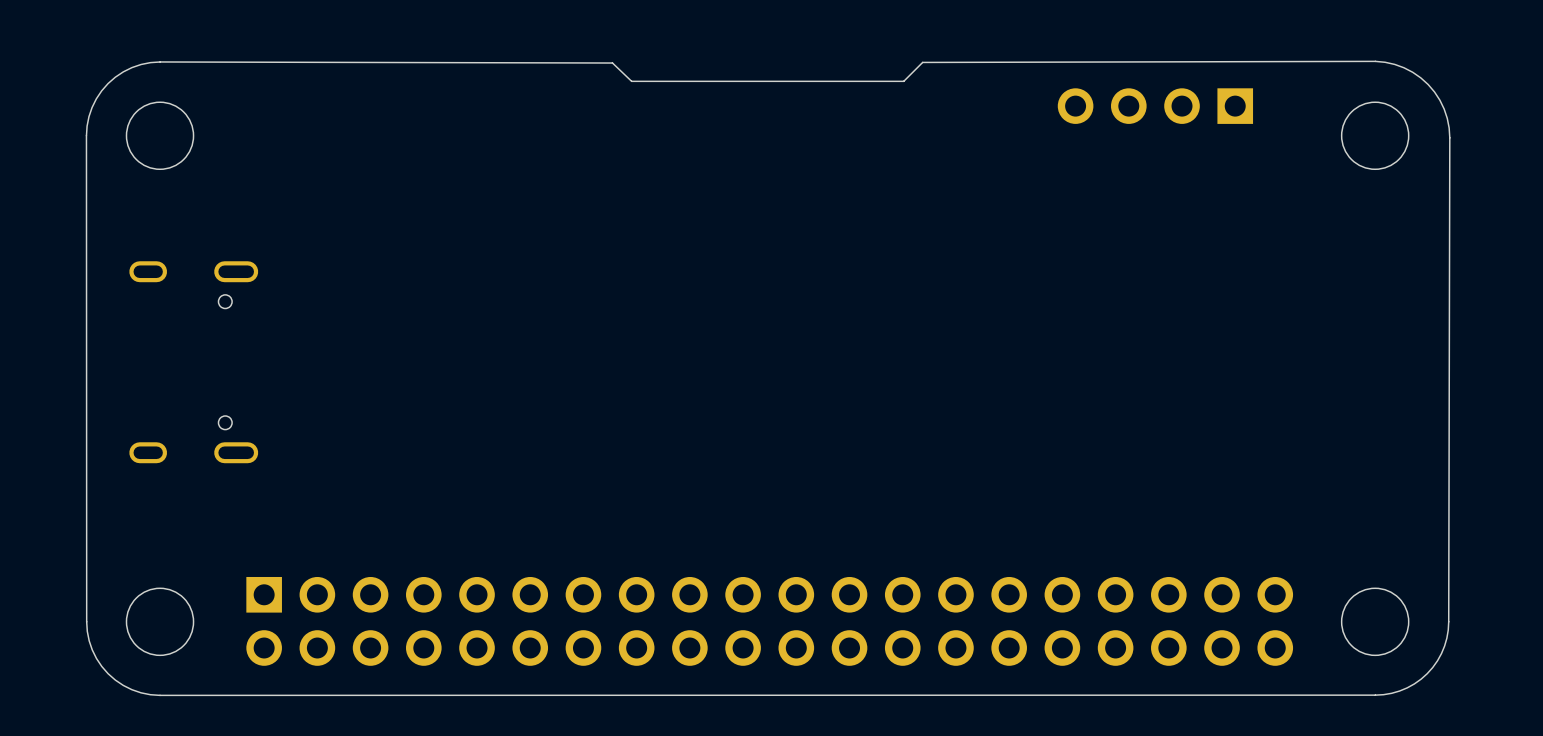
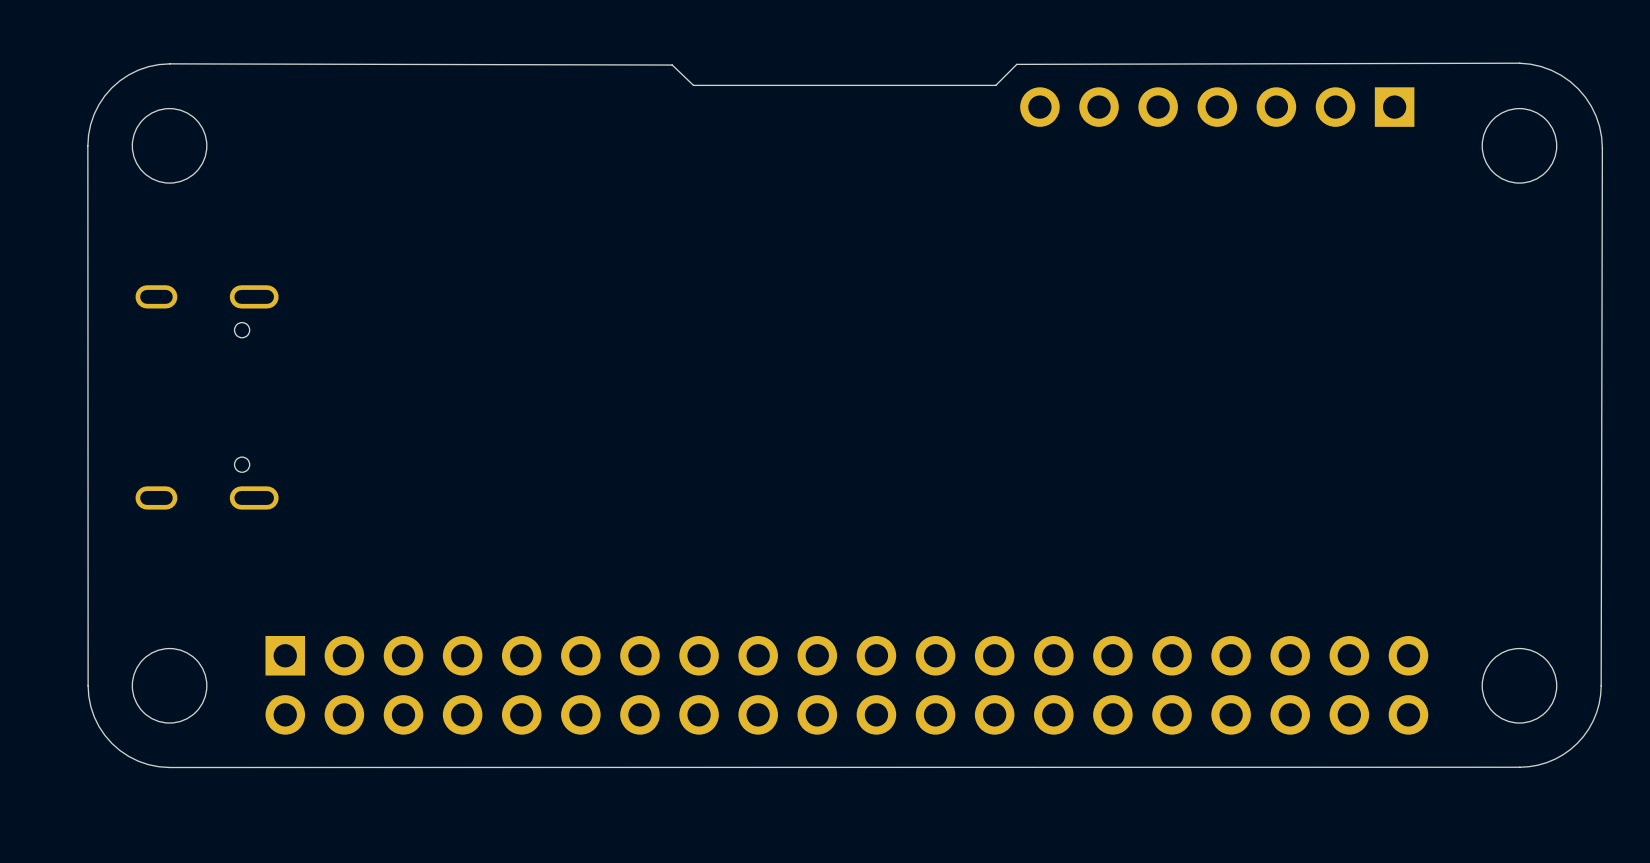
part: none -> (1217, 107)
part: (1155, 106) -> none

